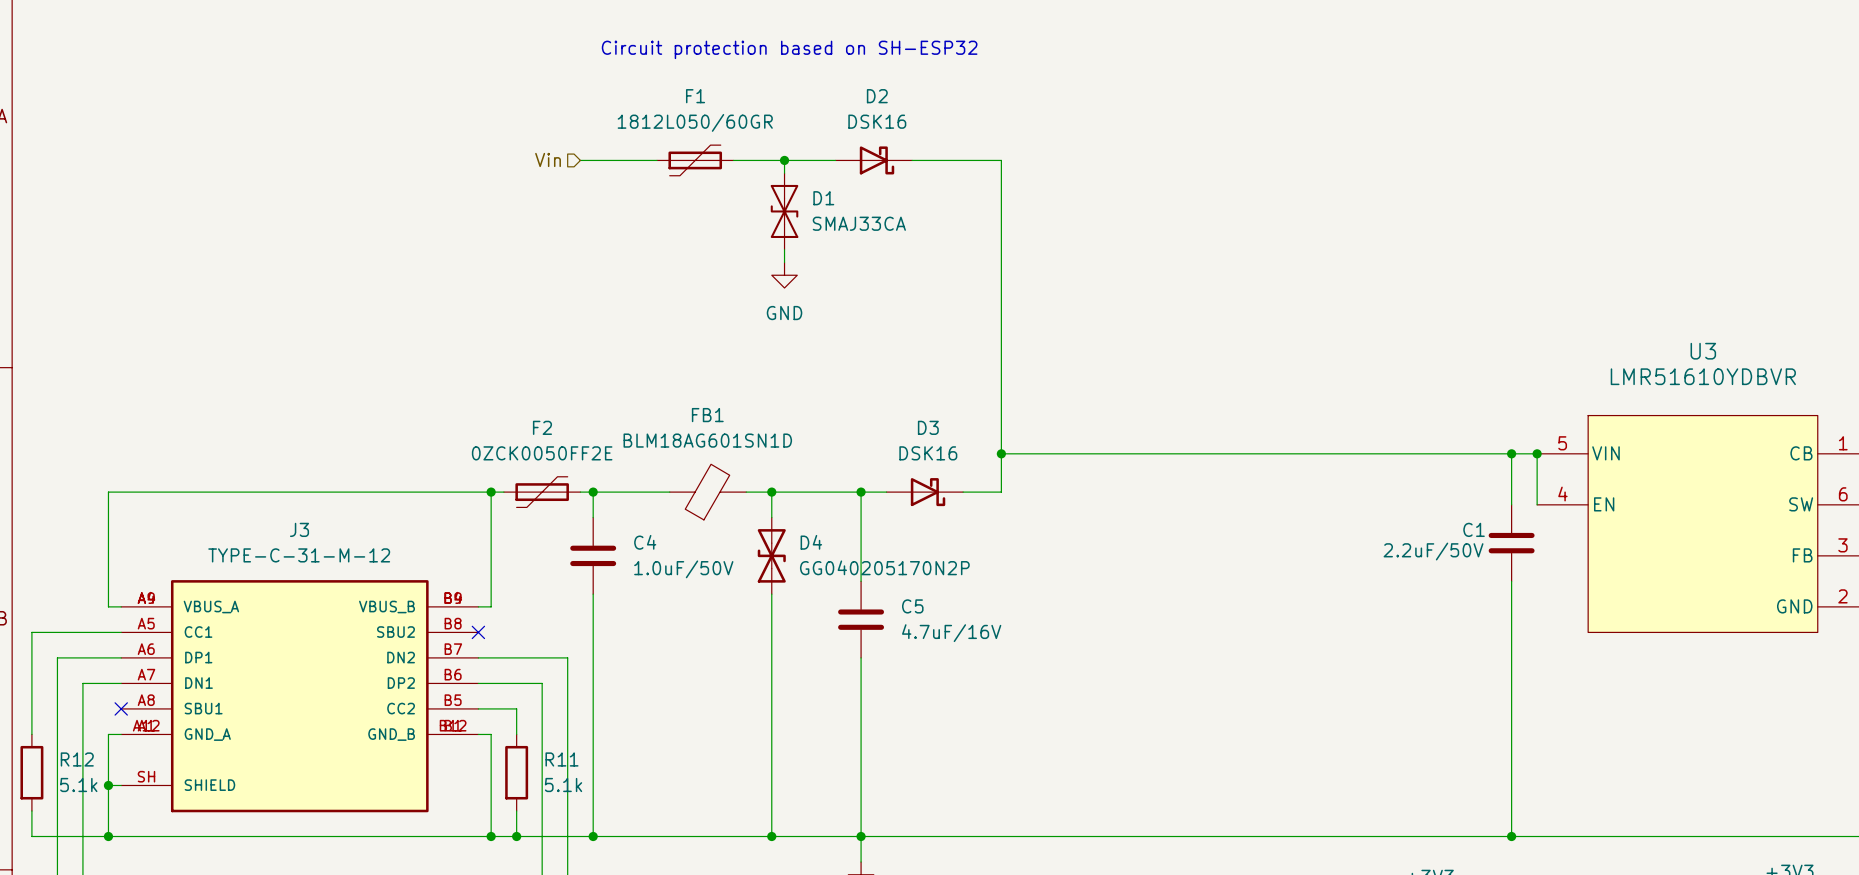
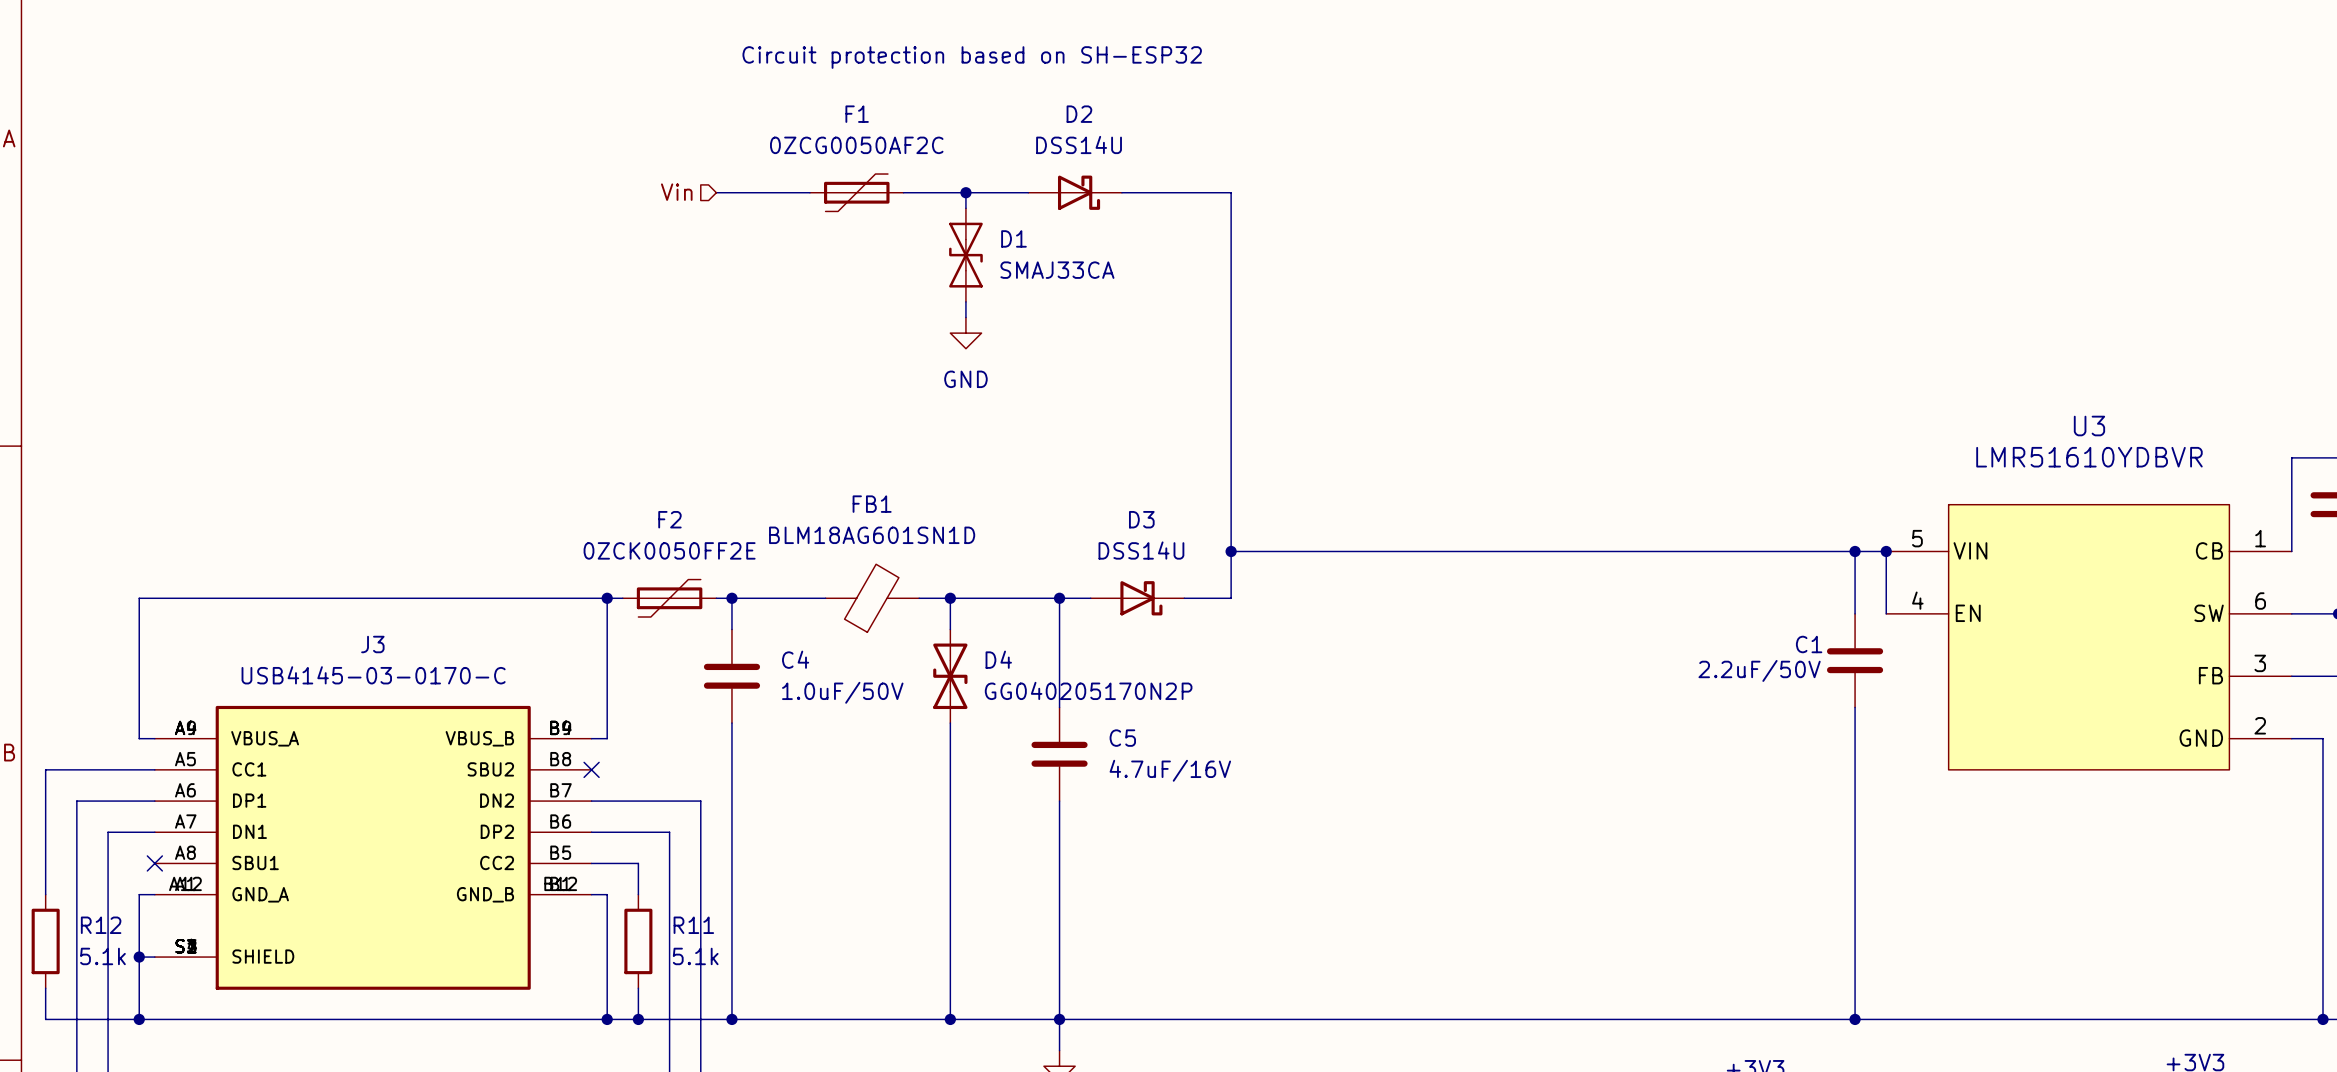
D2 value: DSK16 (877, 121) -> DSS14U (1079, 144)
F1 value: 1812L050/60GR (695, 122) -> 0ZCG0050AF2C (856, 145)
D3 value: DSK16 (928, 453) -> DSS14U (1141, 550)
J3 value: TYPE-C-31-M-12 (299, 555) -> USB4145-03-0170-C (373, 675)
J3 symbol: [121, 580, 479, 813] -> [154, 705, 592, 990]

